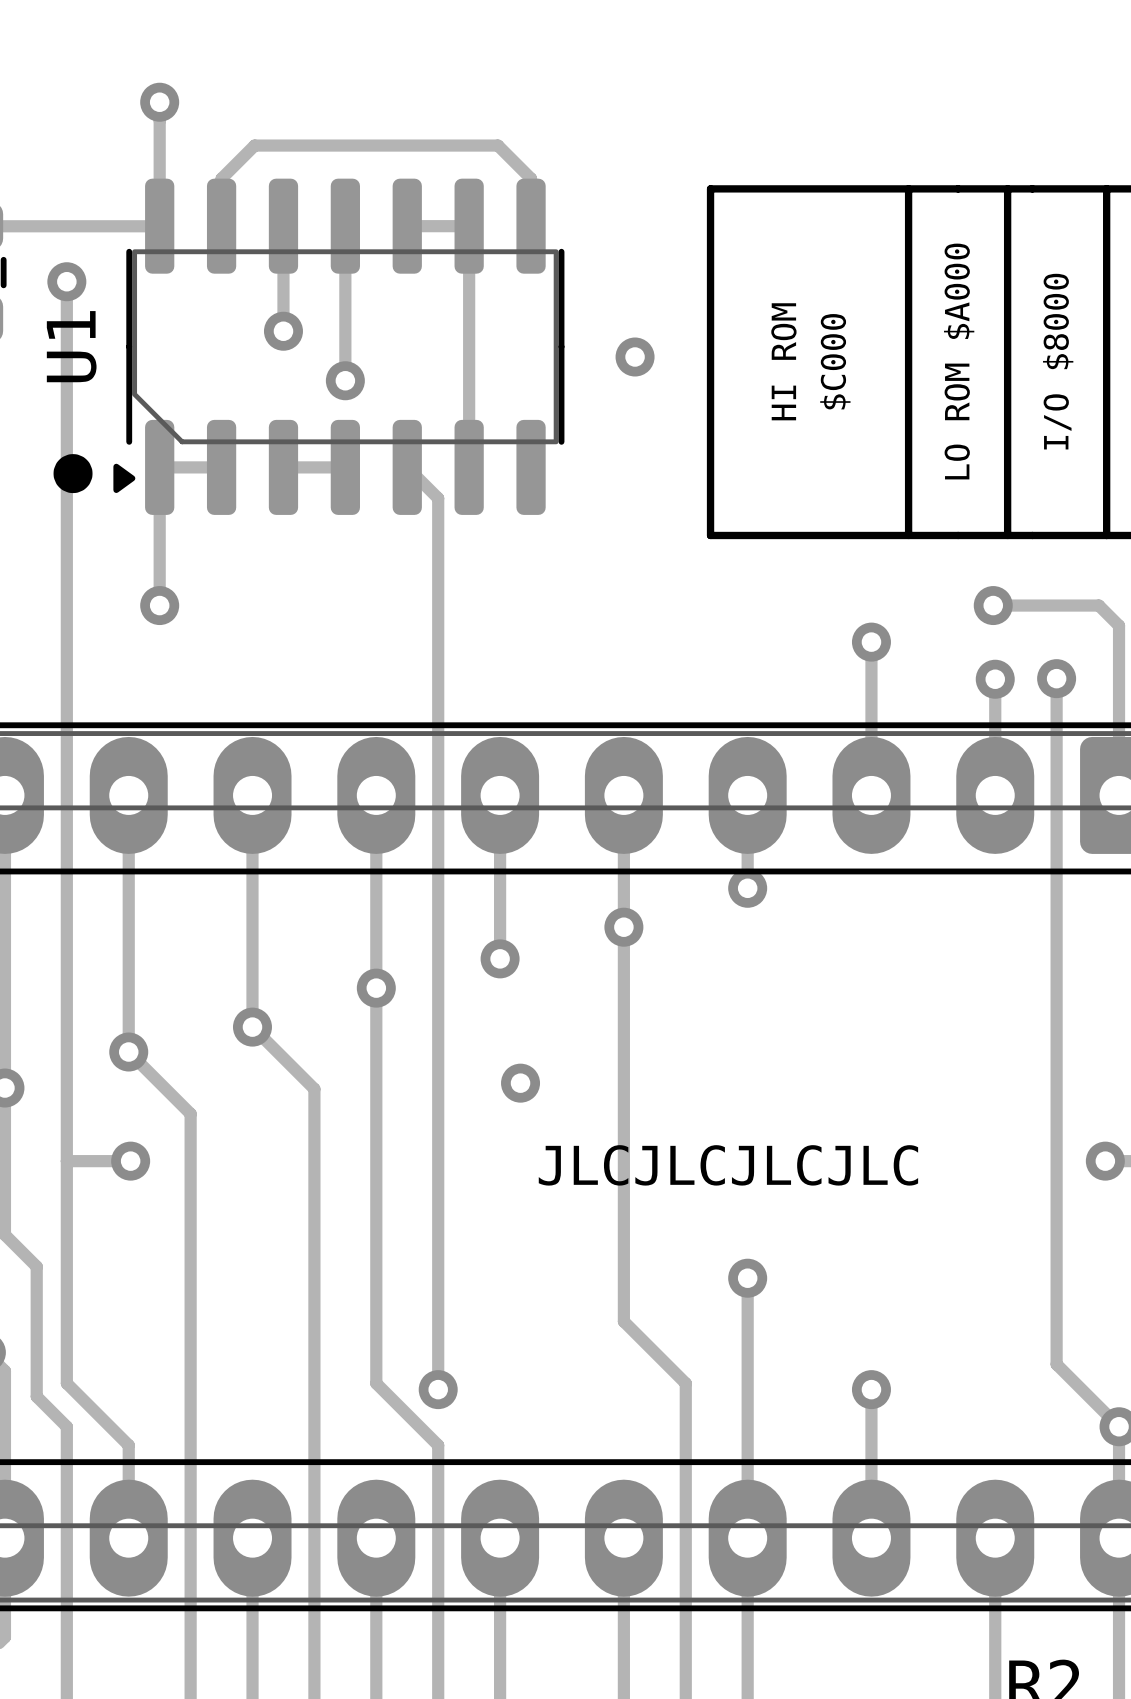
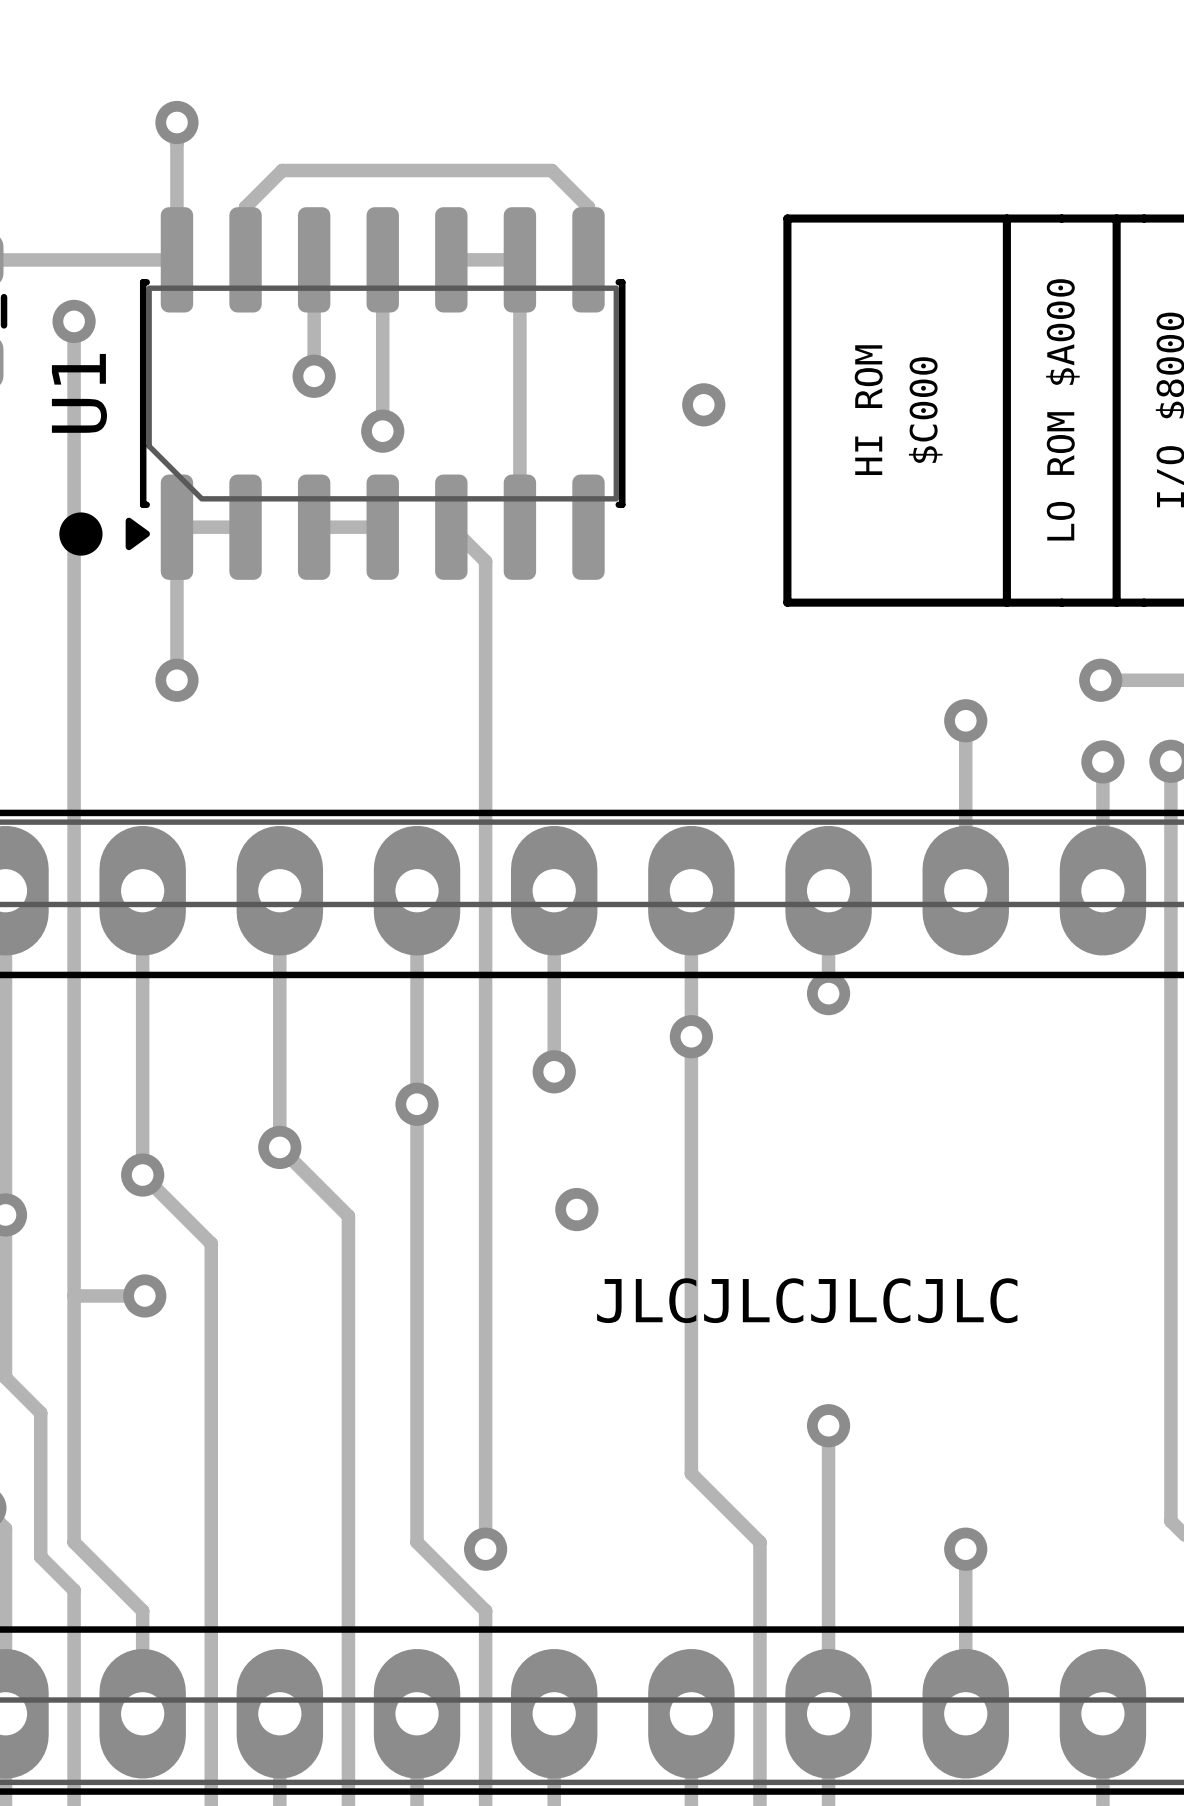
U1 footprint: [113, 178, 565, 515] -> [125, 207, 626, 580]

